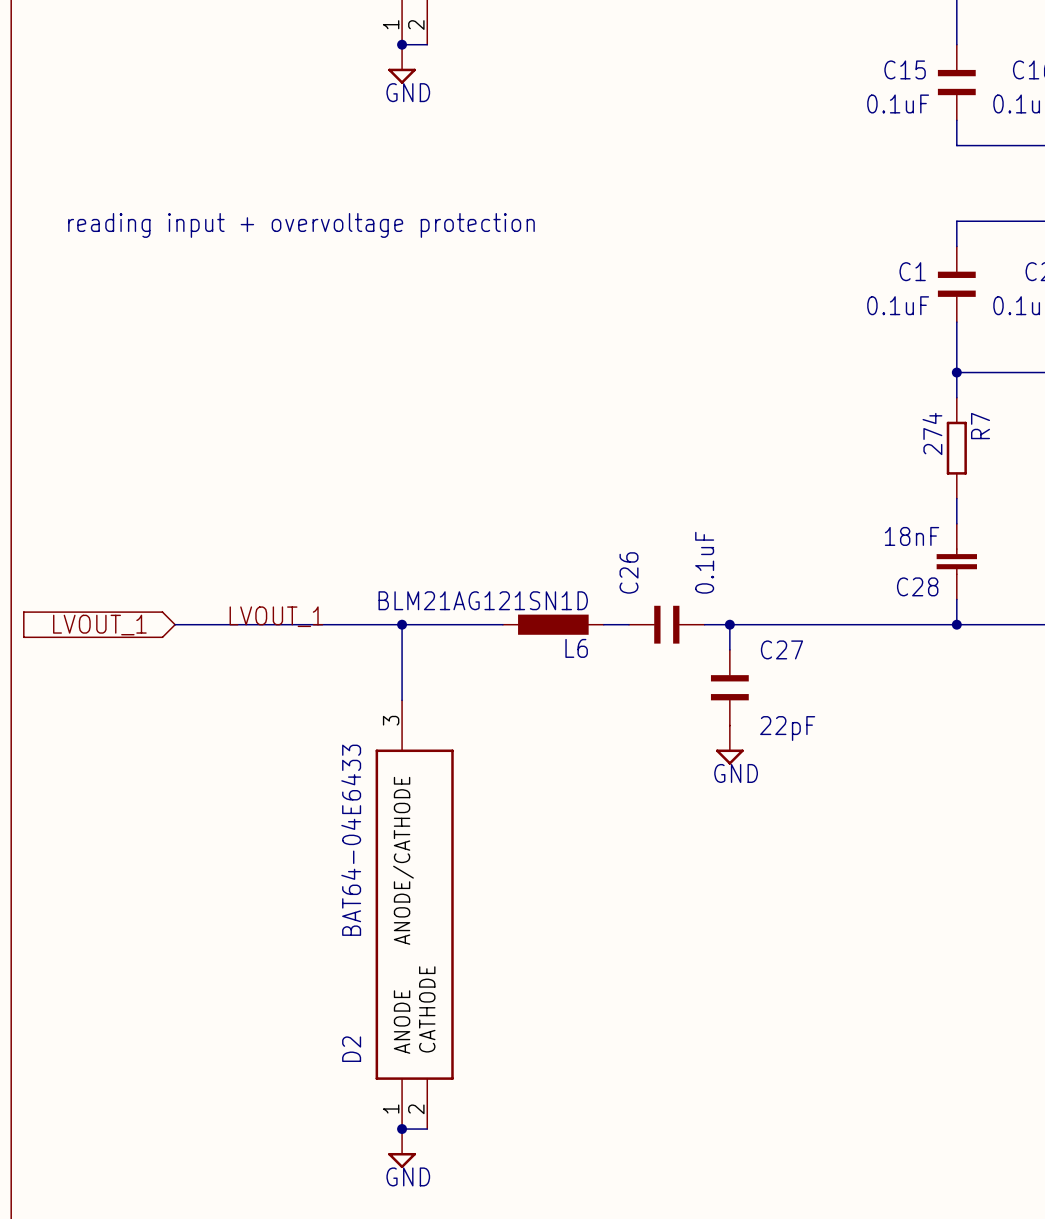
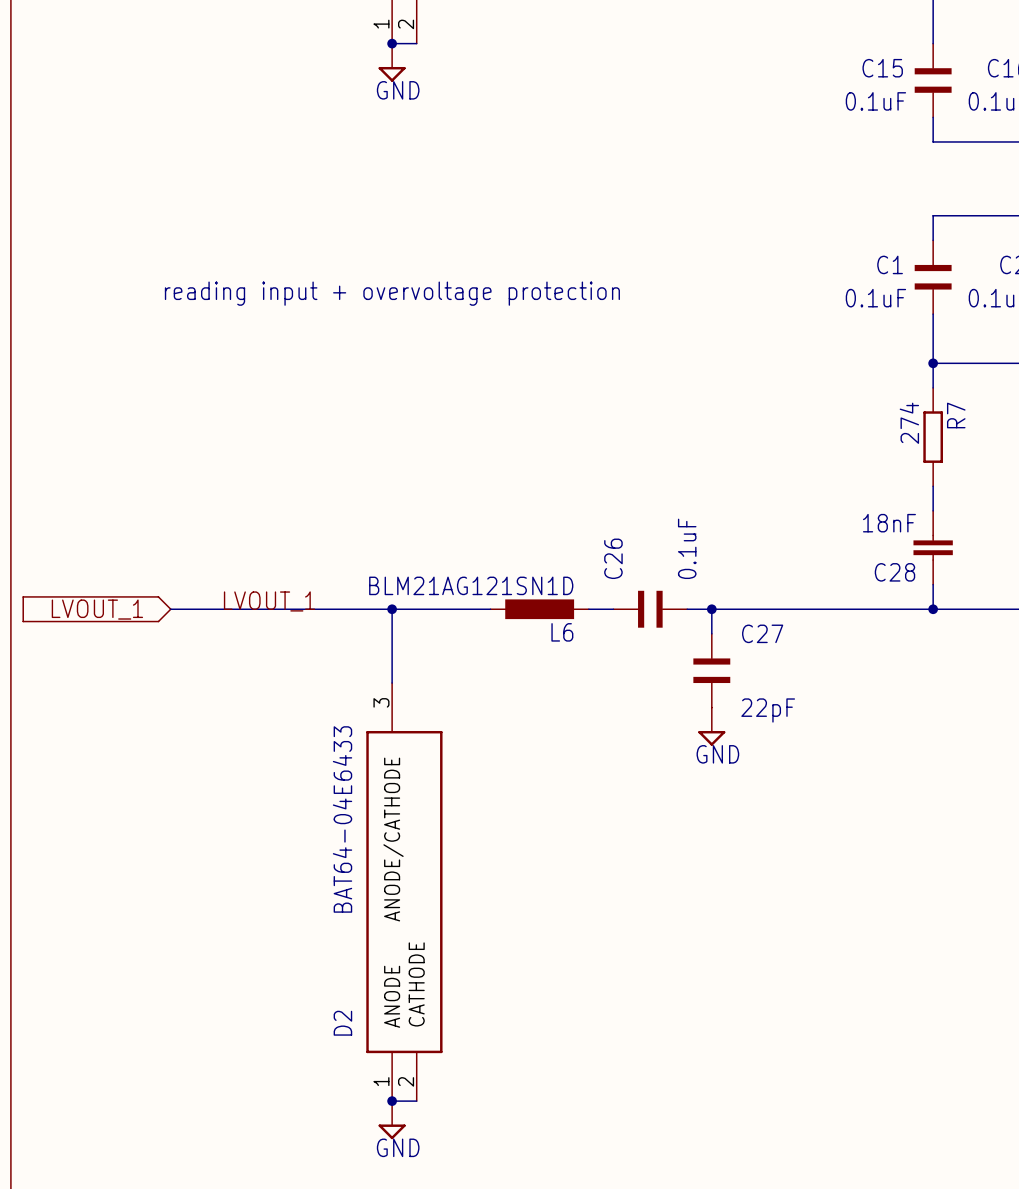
text position: reading input + overvoltage protection (301, 225) -> reading input + overvoltage protection (392, 293)

